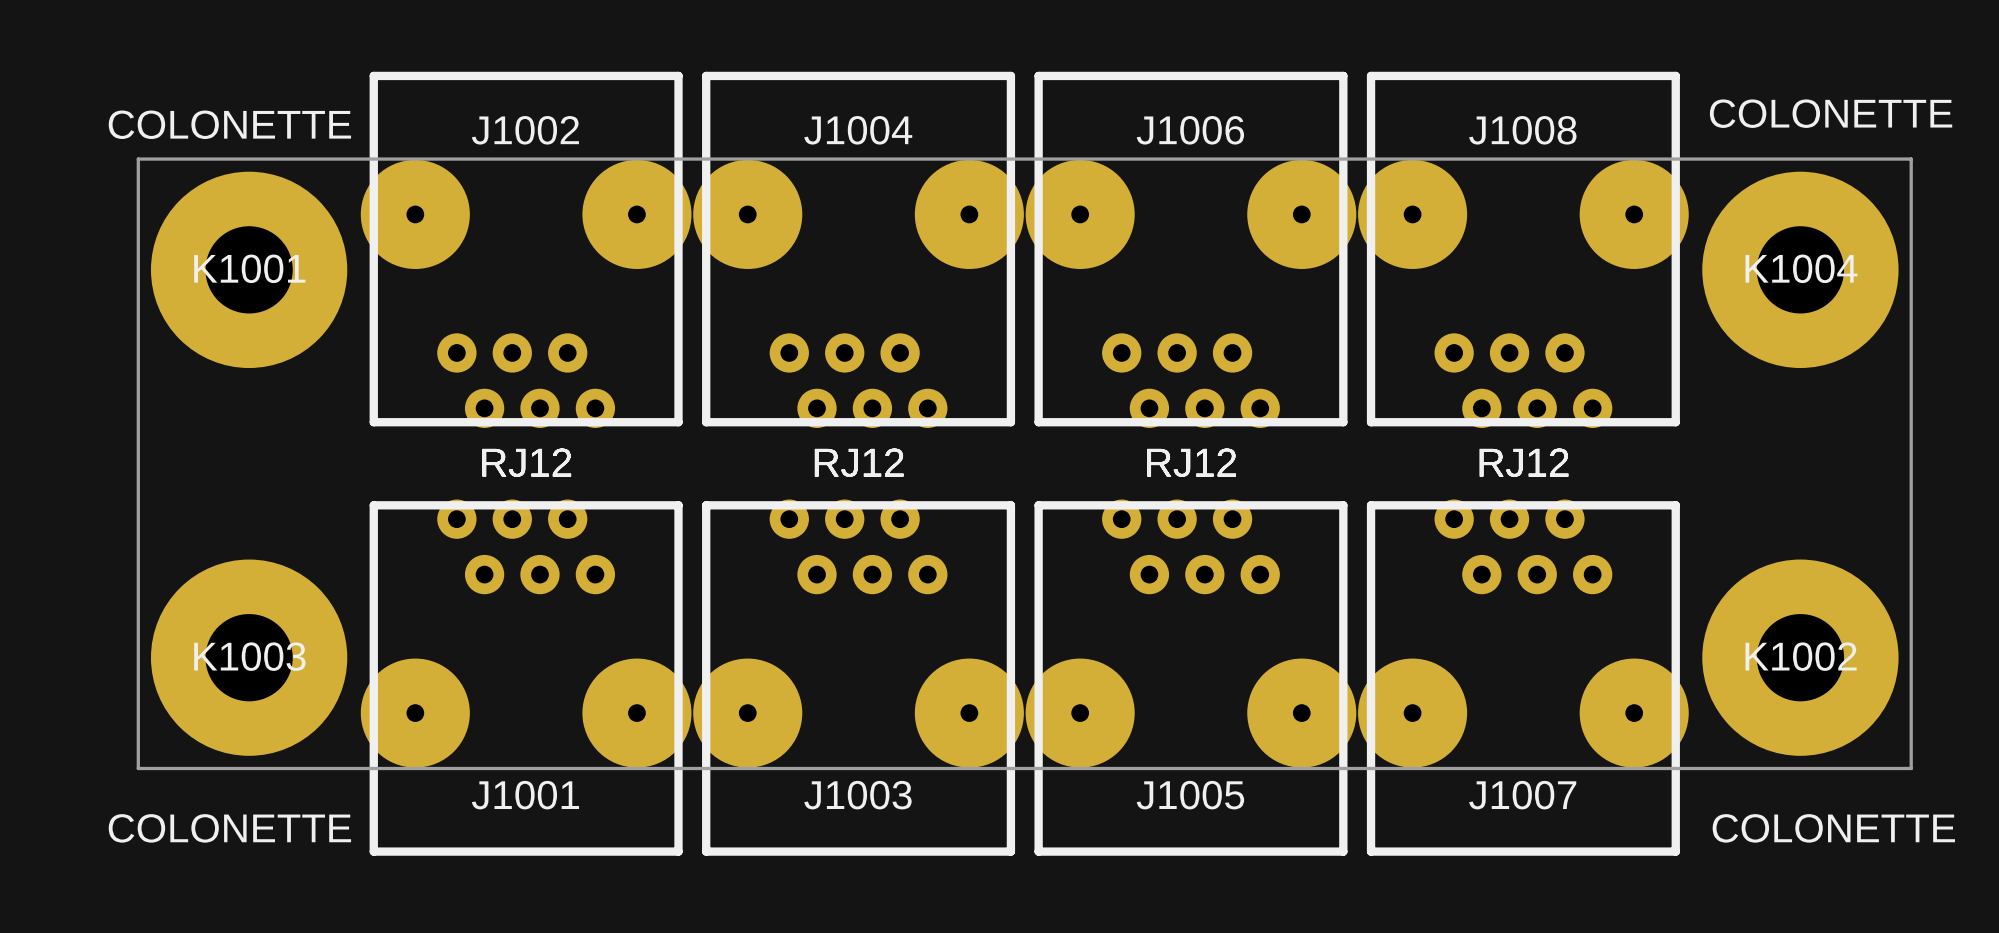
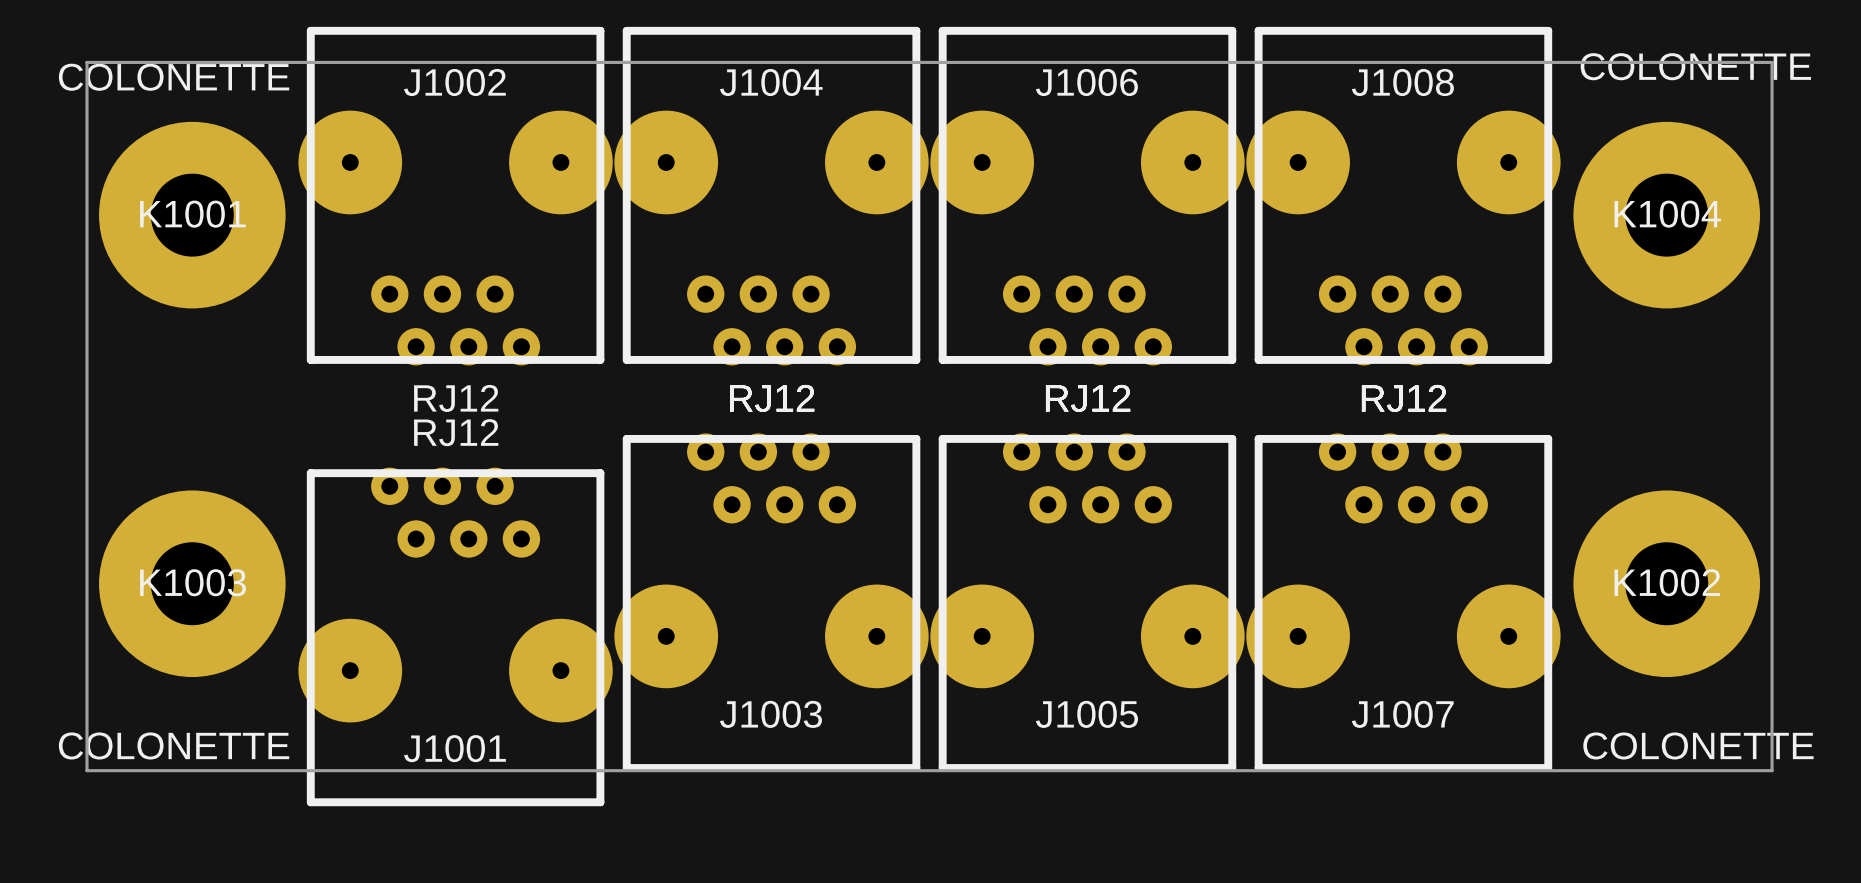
board edge: (138, 159) (1911, 159) -> (87, 109) (87, 62) (1772, 62) (1772, 109)
J1001 position: (526, 677) -> (455, 636)
board edge: (138, 768) (1911, 768) -> (87, 689) (87, 770) (1772, 770) (1772, 689)

